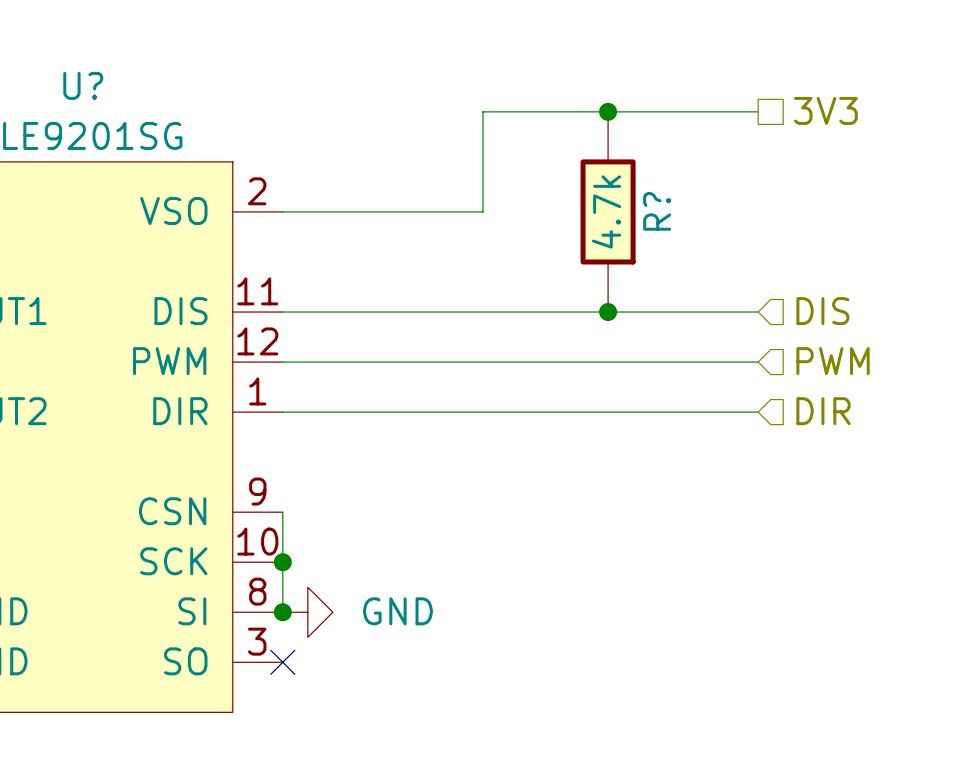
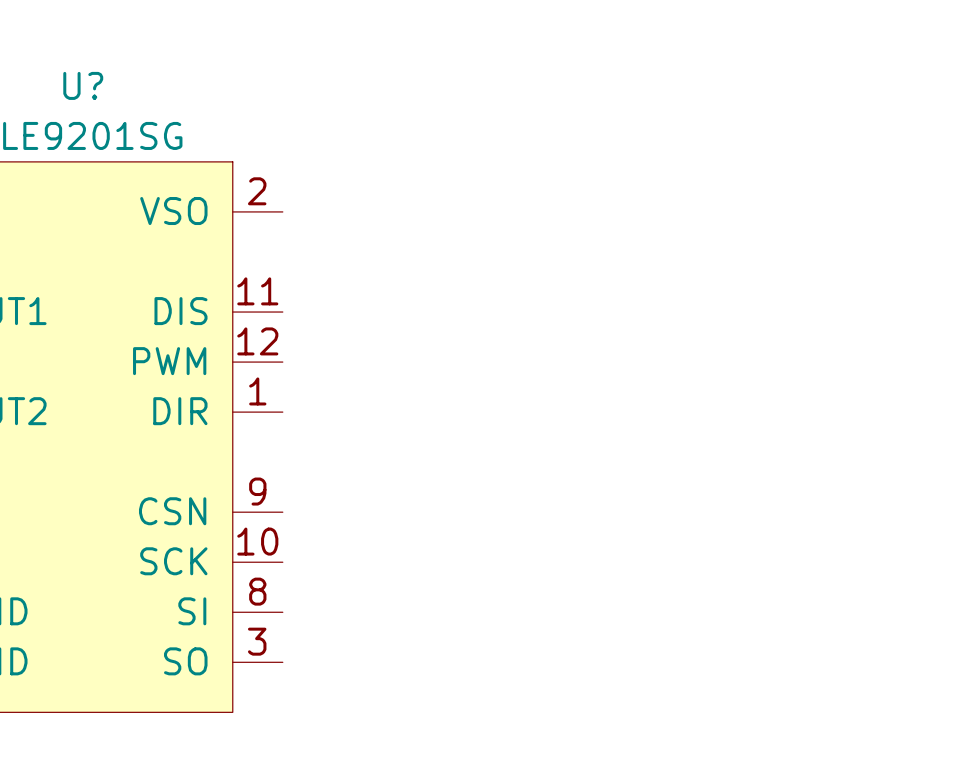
hierarchical label: 3V3 (825, 110) -> none
junction: (608, 111) -> none
wire: (758, 111) (482, 111) (482, 211) (282, 211) -> none
R?: 4.7k (608, 211) -> none
hierarchical label: DIS (822, 311) -> none
wire: (282, 312) (758, 312) -> none
junction: (608, 312) -> none
hierarchical label: PWM (833, 361) -> none
wire: (282, 362) (758, 362) -> none
hierarchical label: DIR (823, 411) -> none
wire: (282, 412) (758, 412) -> none
wire: (282, 512) (282, 612) -> none
junction: (282, 562) -> none
junction: (282, 612) -> none
power symbol: GND (307, 612) -> none
no-connect mark: (282, 662) -> none

